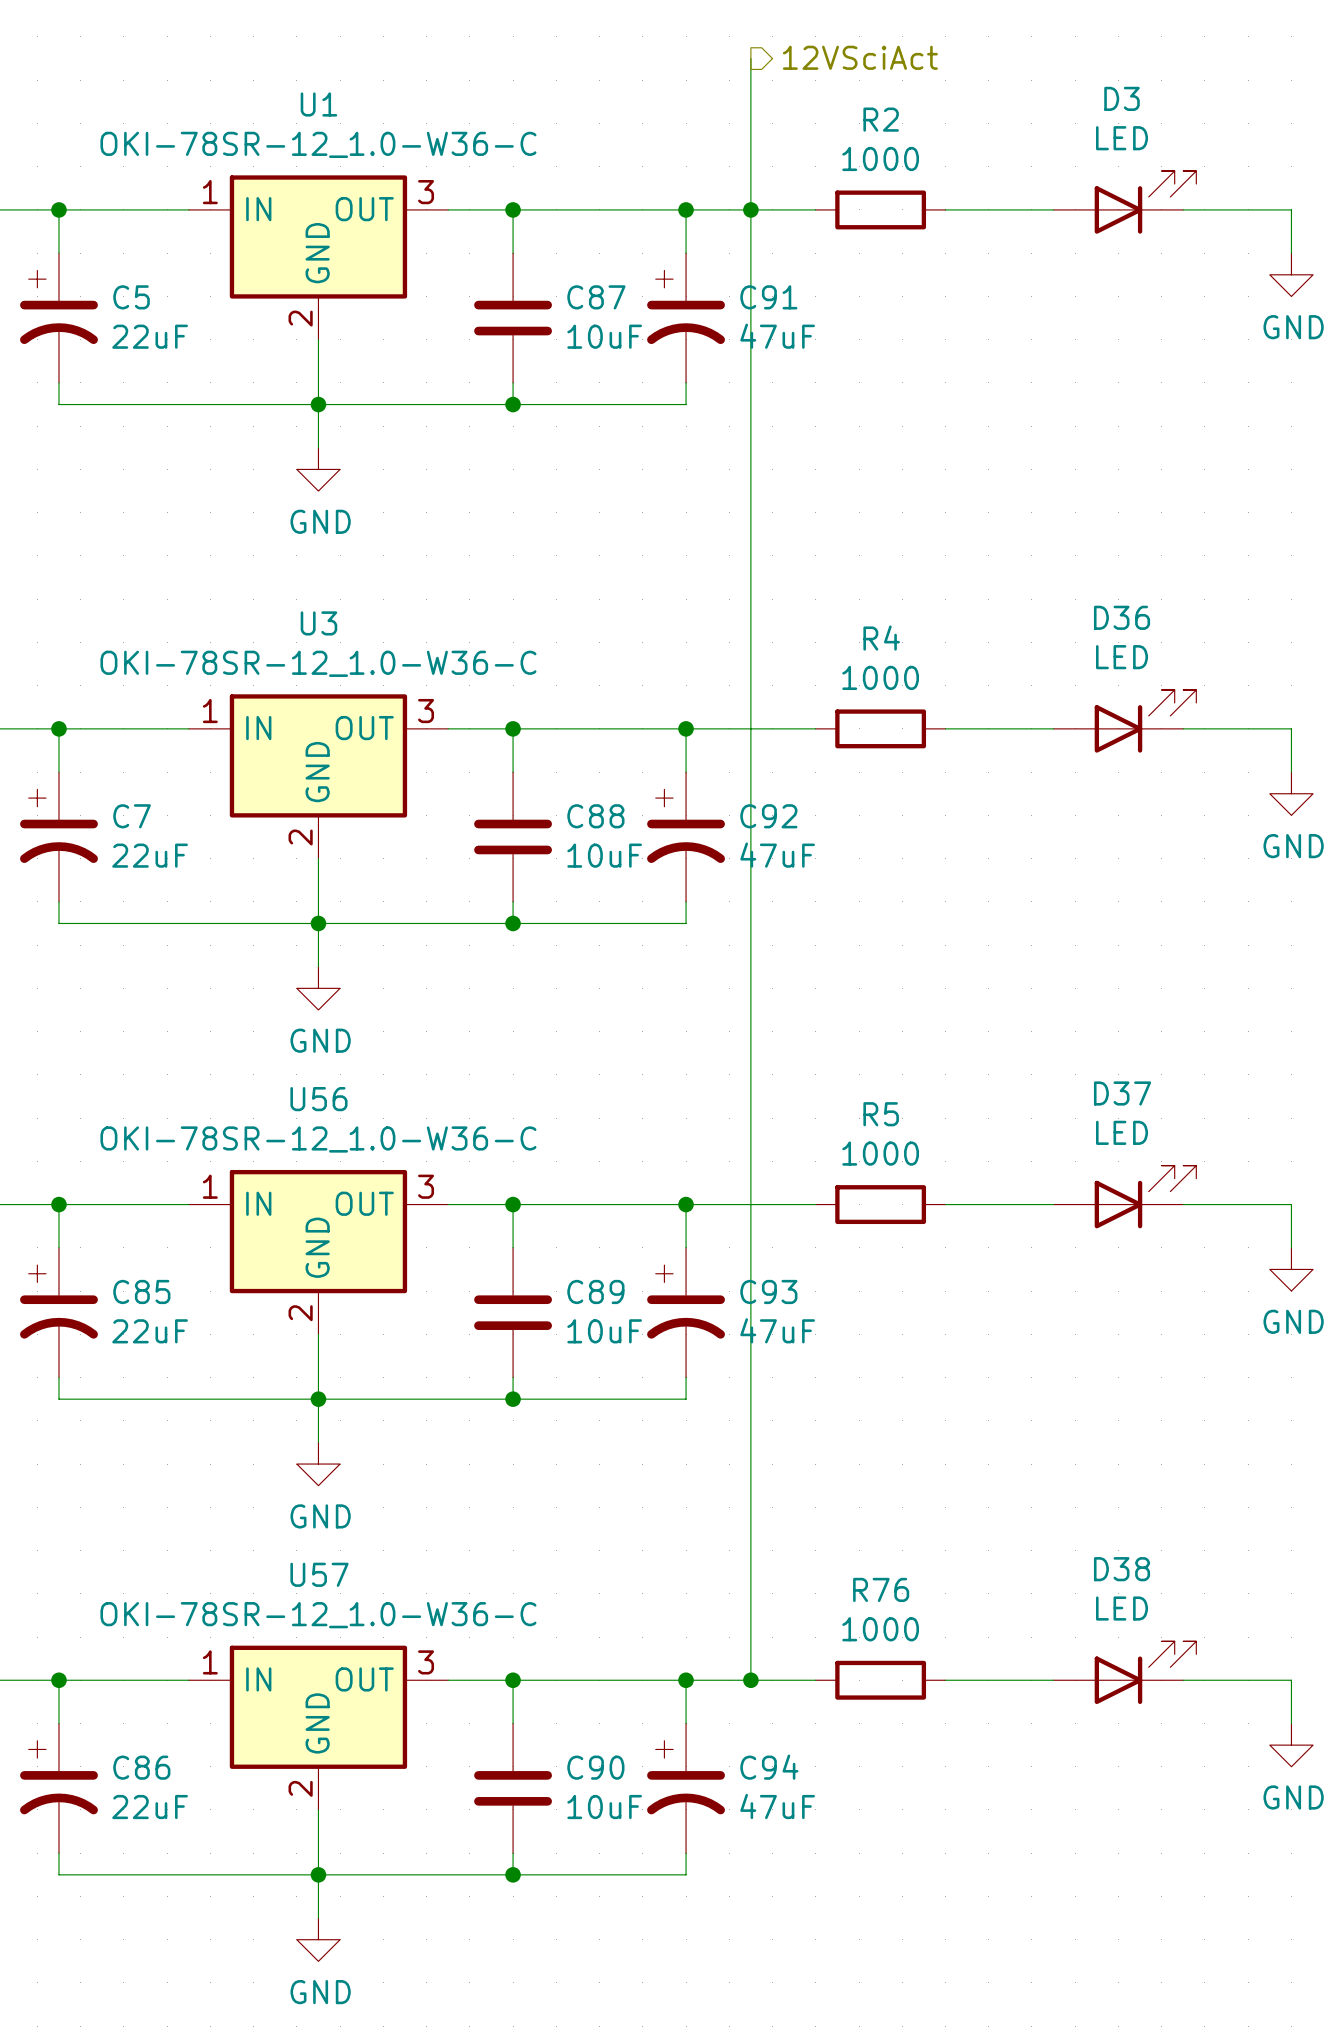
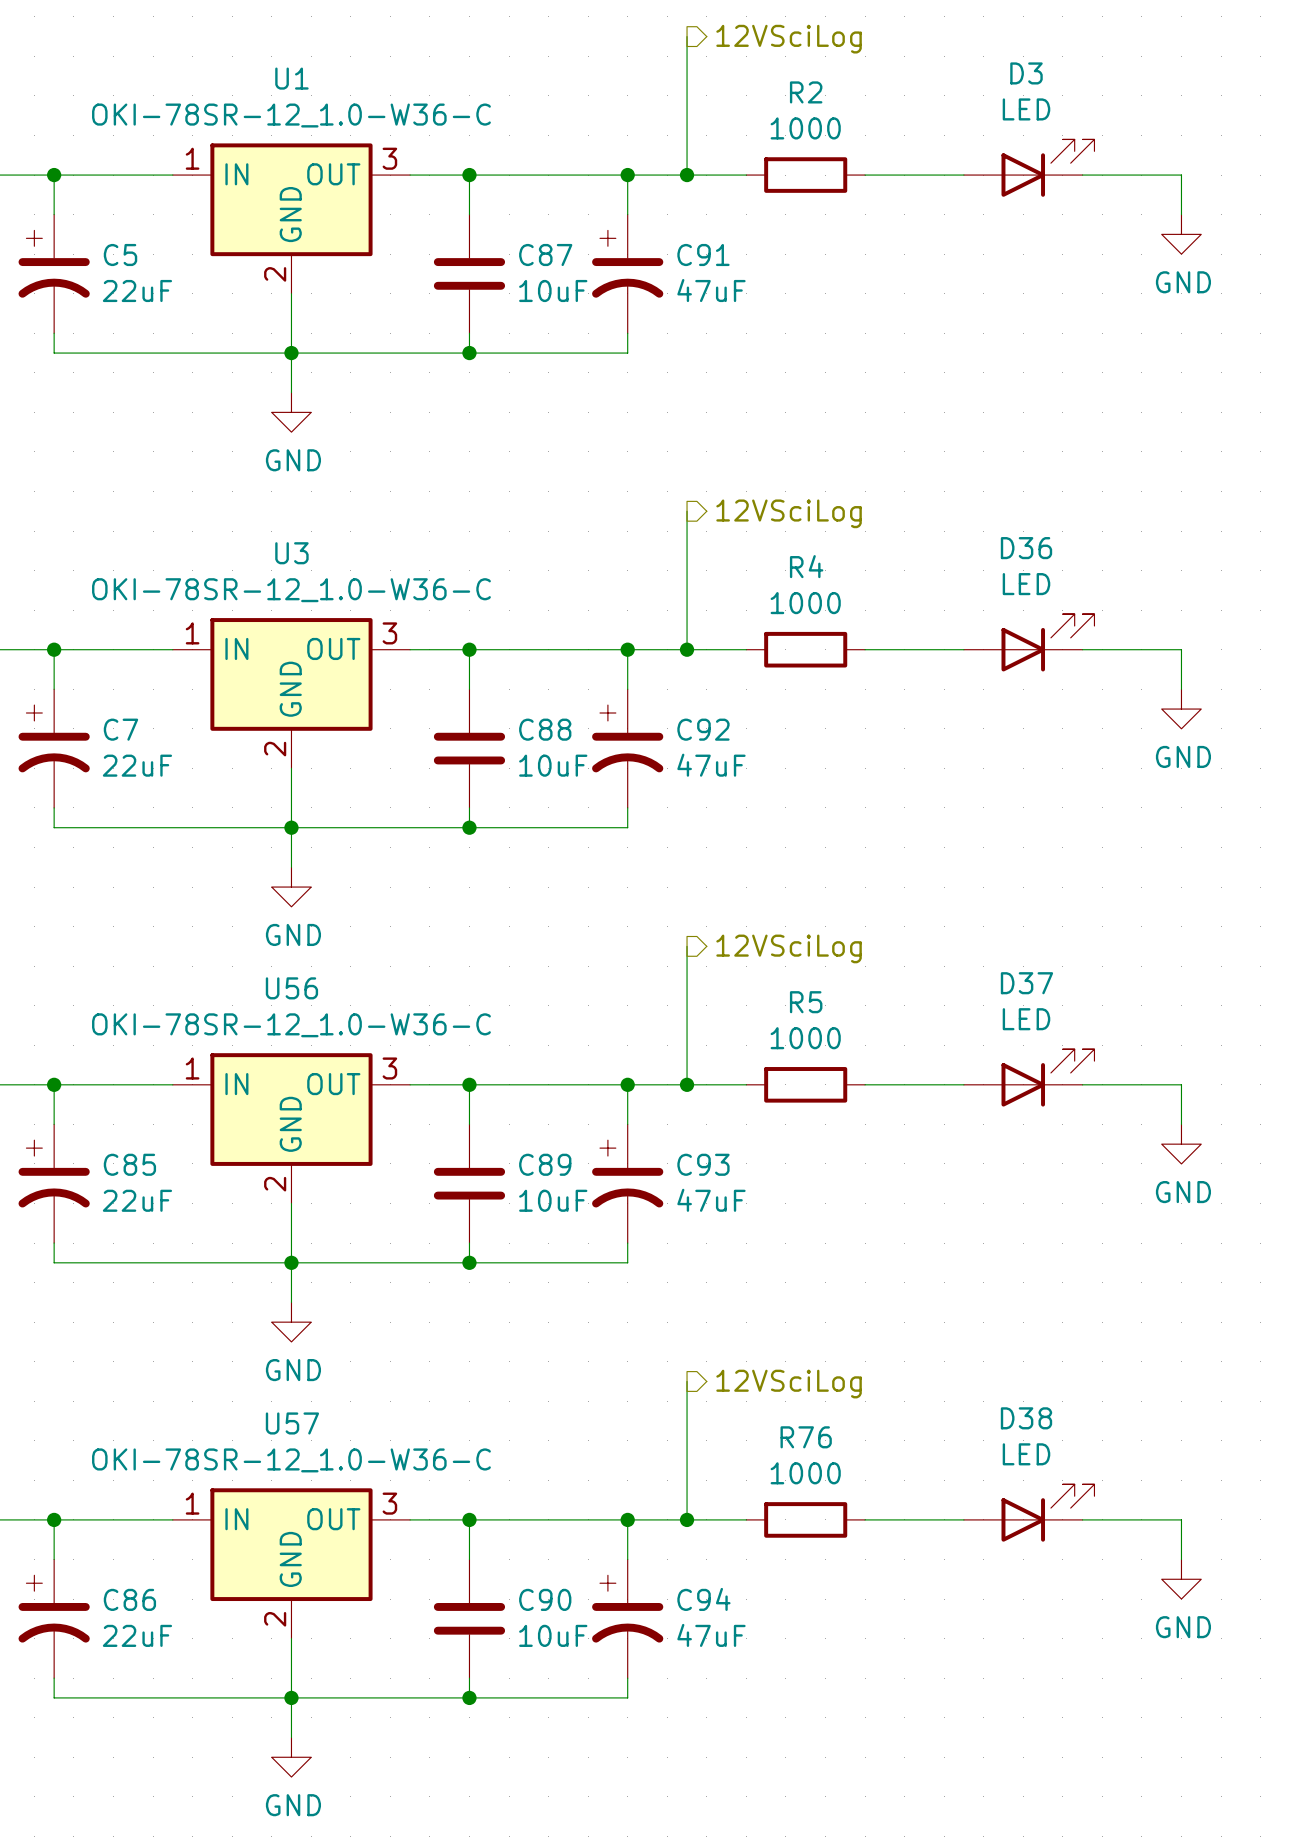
hierarchical label: 12VSciAct (860, 57) -> 12VSciLog (789, 39)
wire: (750, 209) (750, 577) -> none
hierarchical label: none -> 12VSciLog (789, 513)
wire: (750, 728) (750, 1053) -> none
junction: none -> (687, 649)
hierarchical label: none -> 12VSciLog (789, 948)
wire: (750, 1204) (750, 1528) -> none
junction: none -> (687, 1084)
hierarchical label: none -> 12VSciLog (789, 1384)

